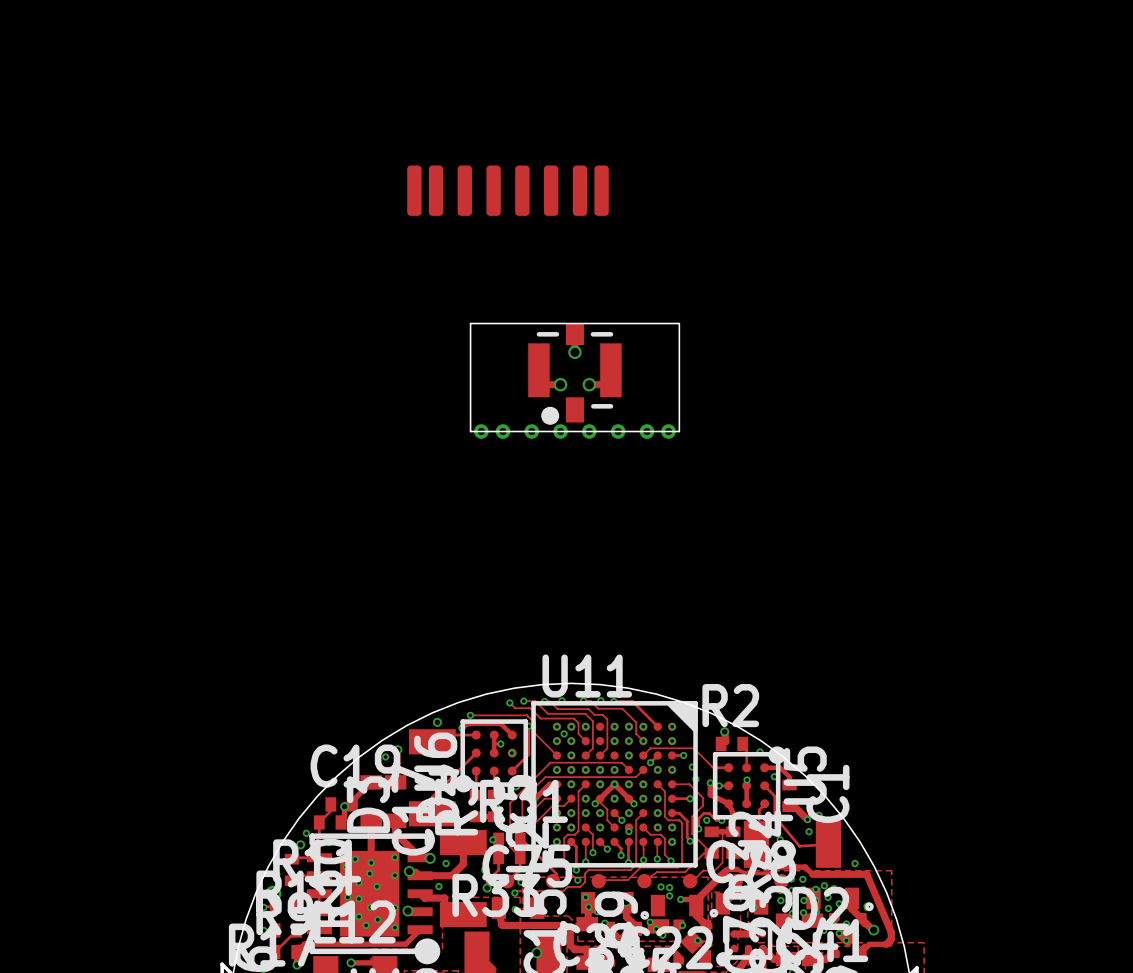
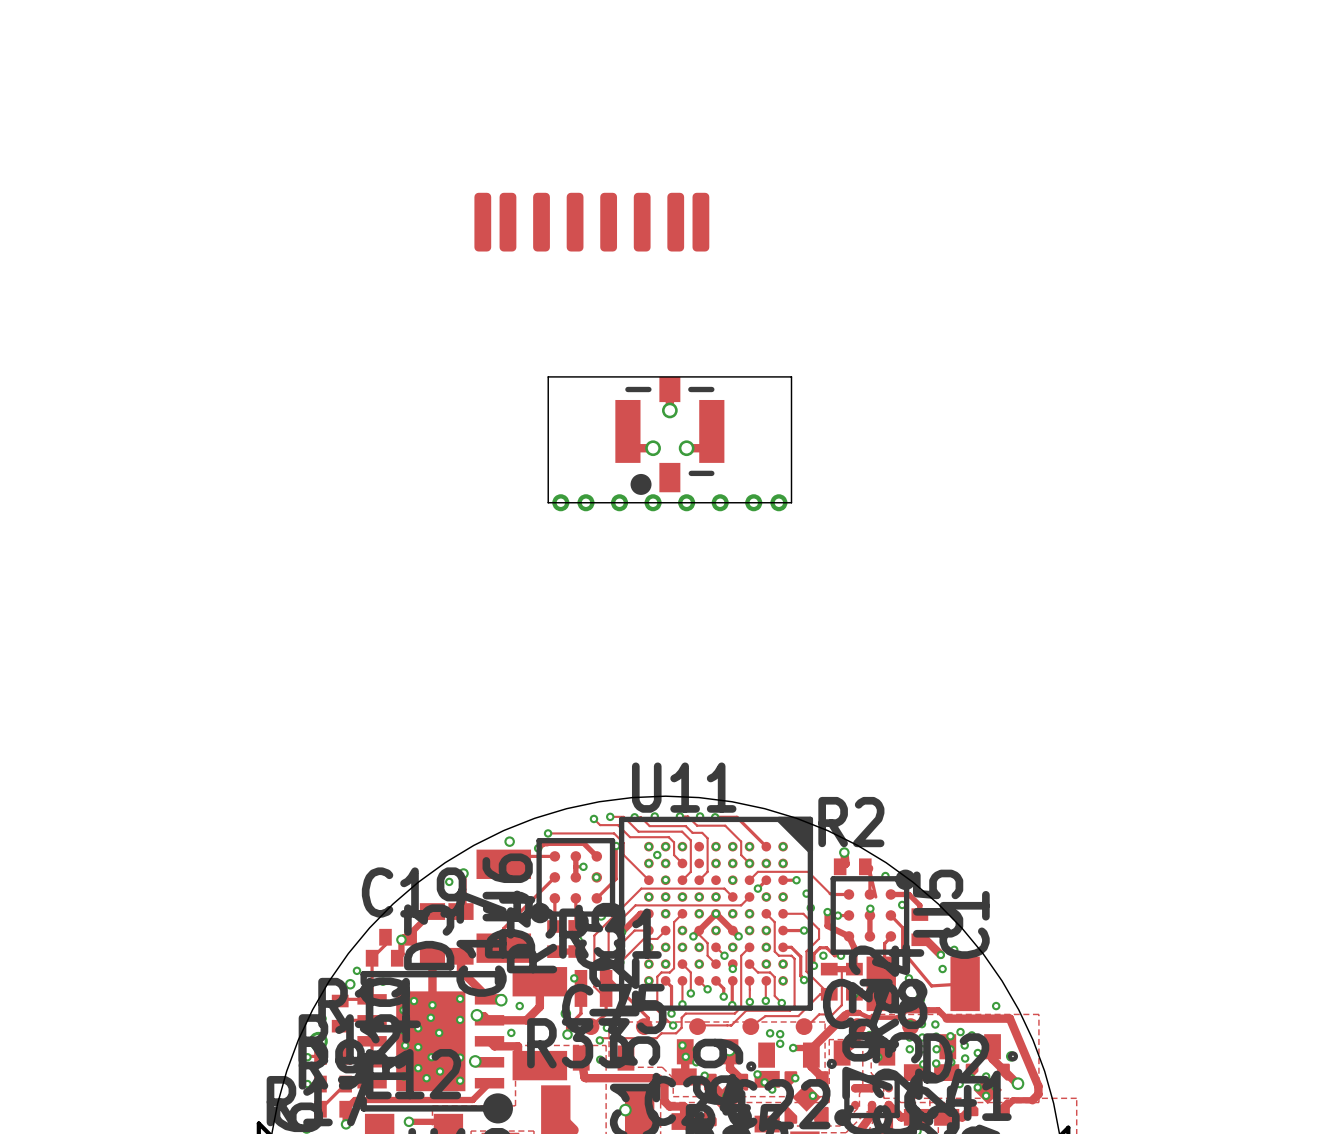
track: none -> (871, 866) (869, 871) (875, 897)

